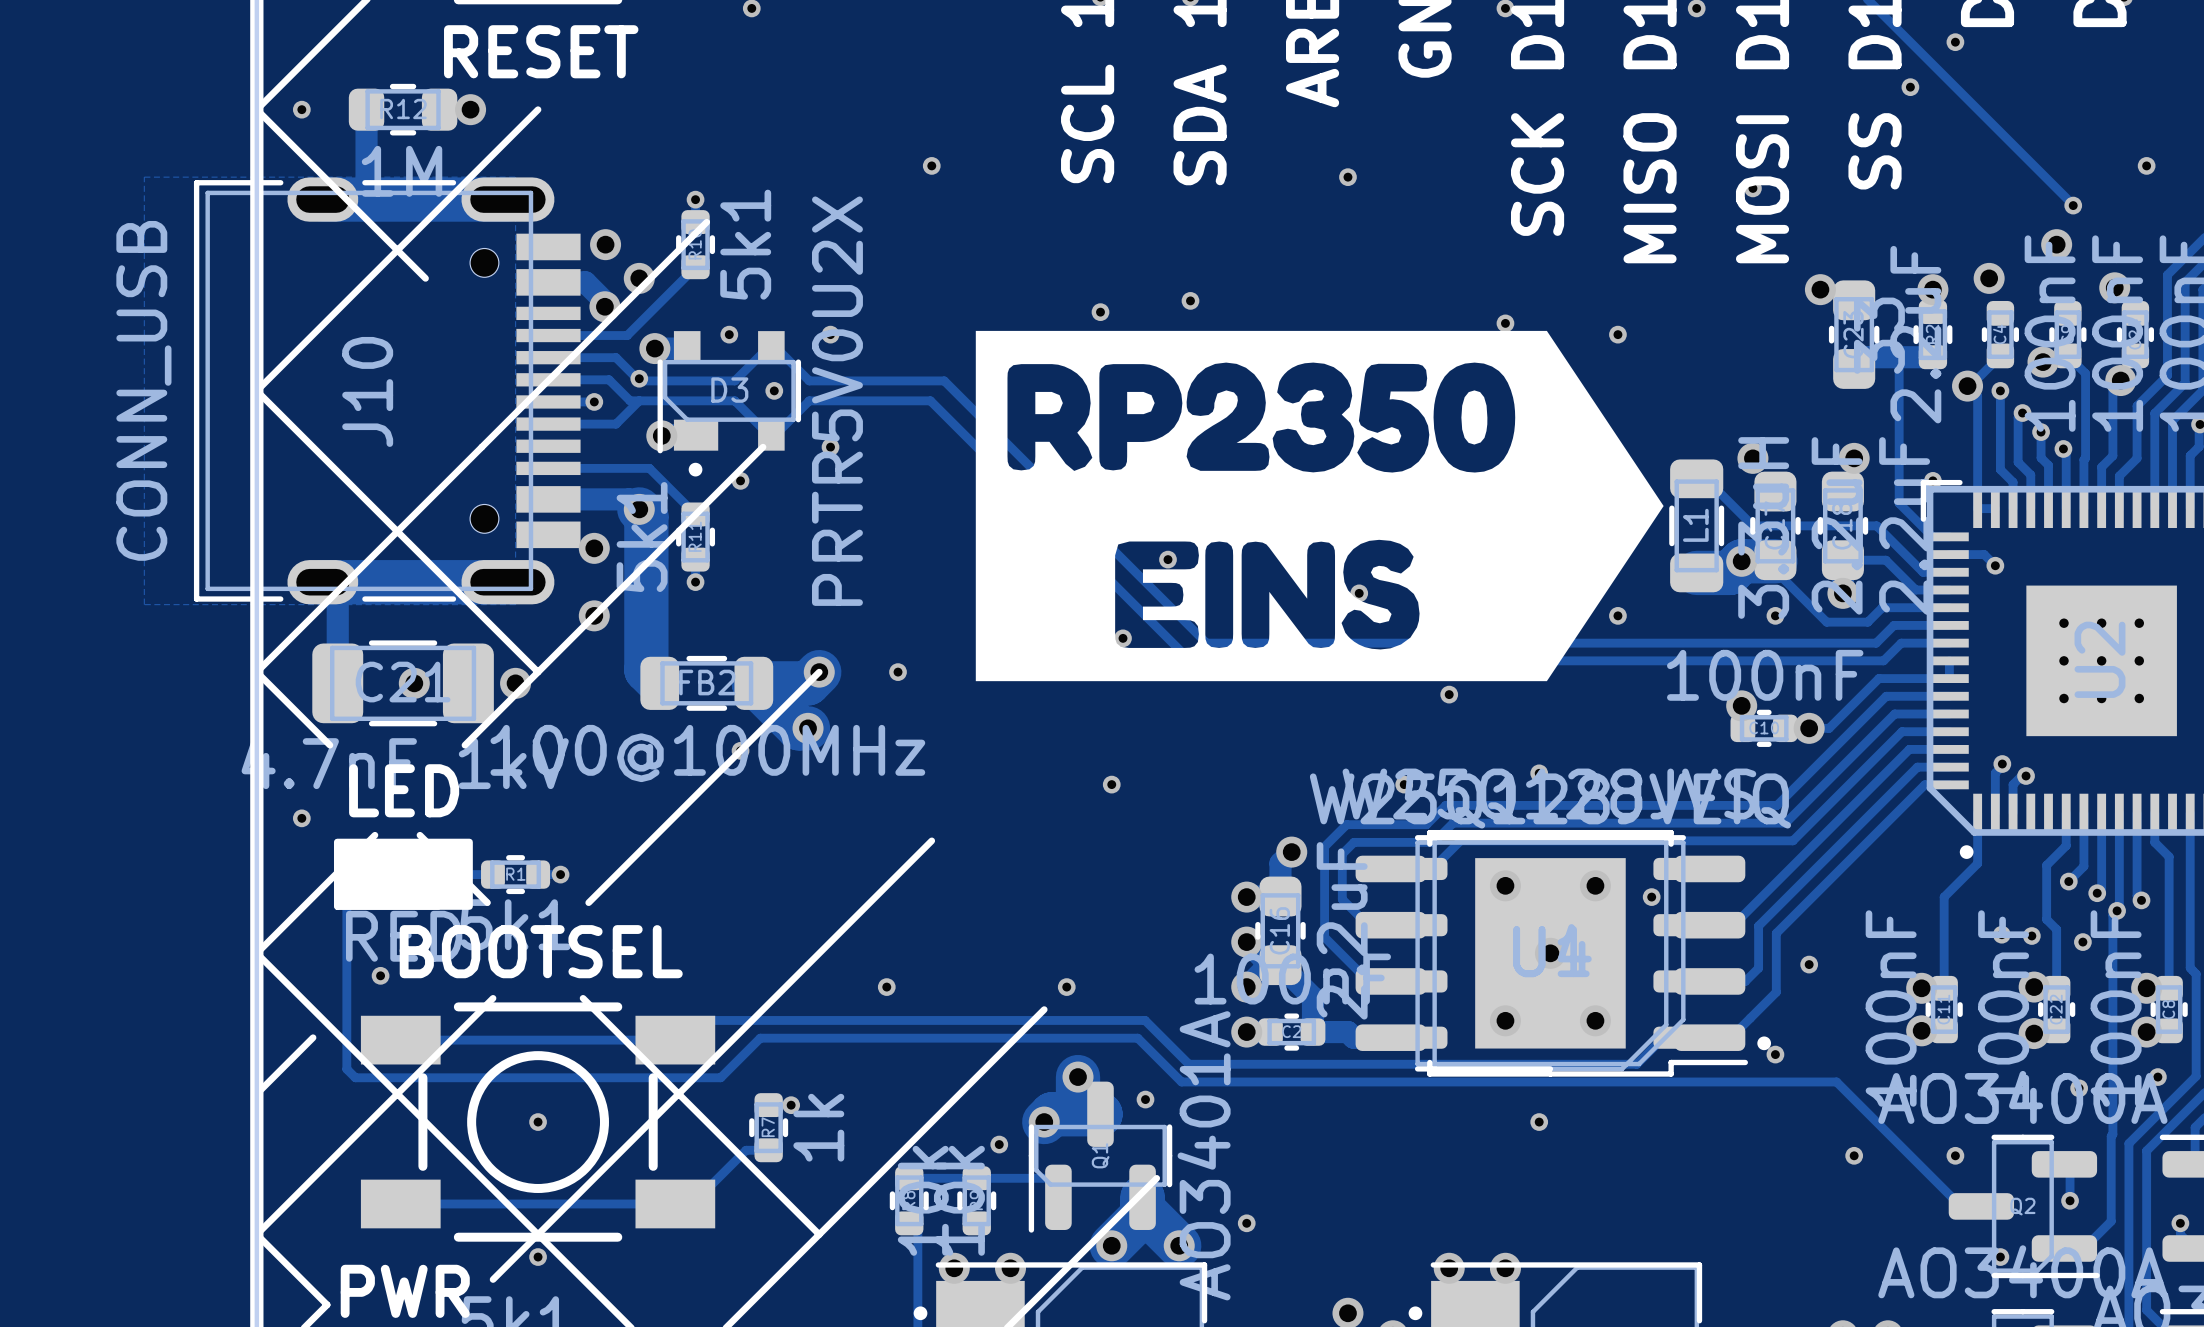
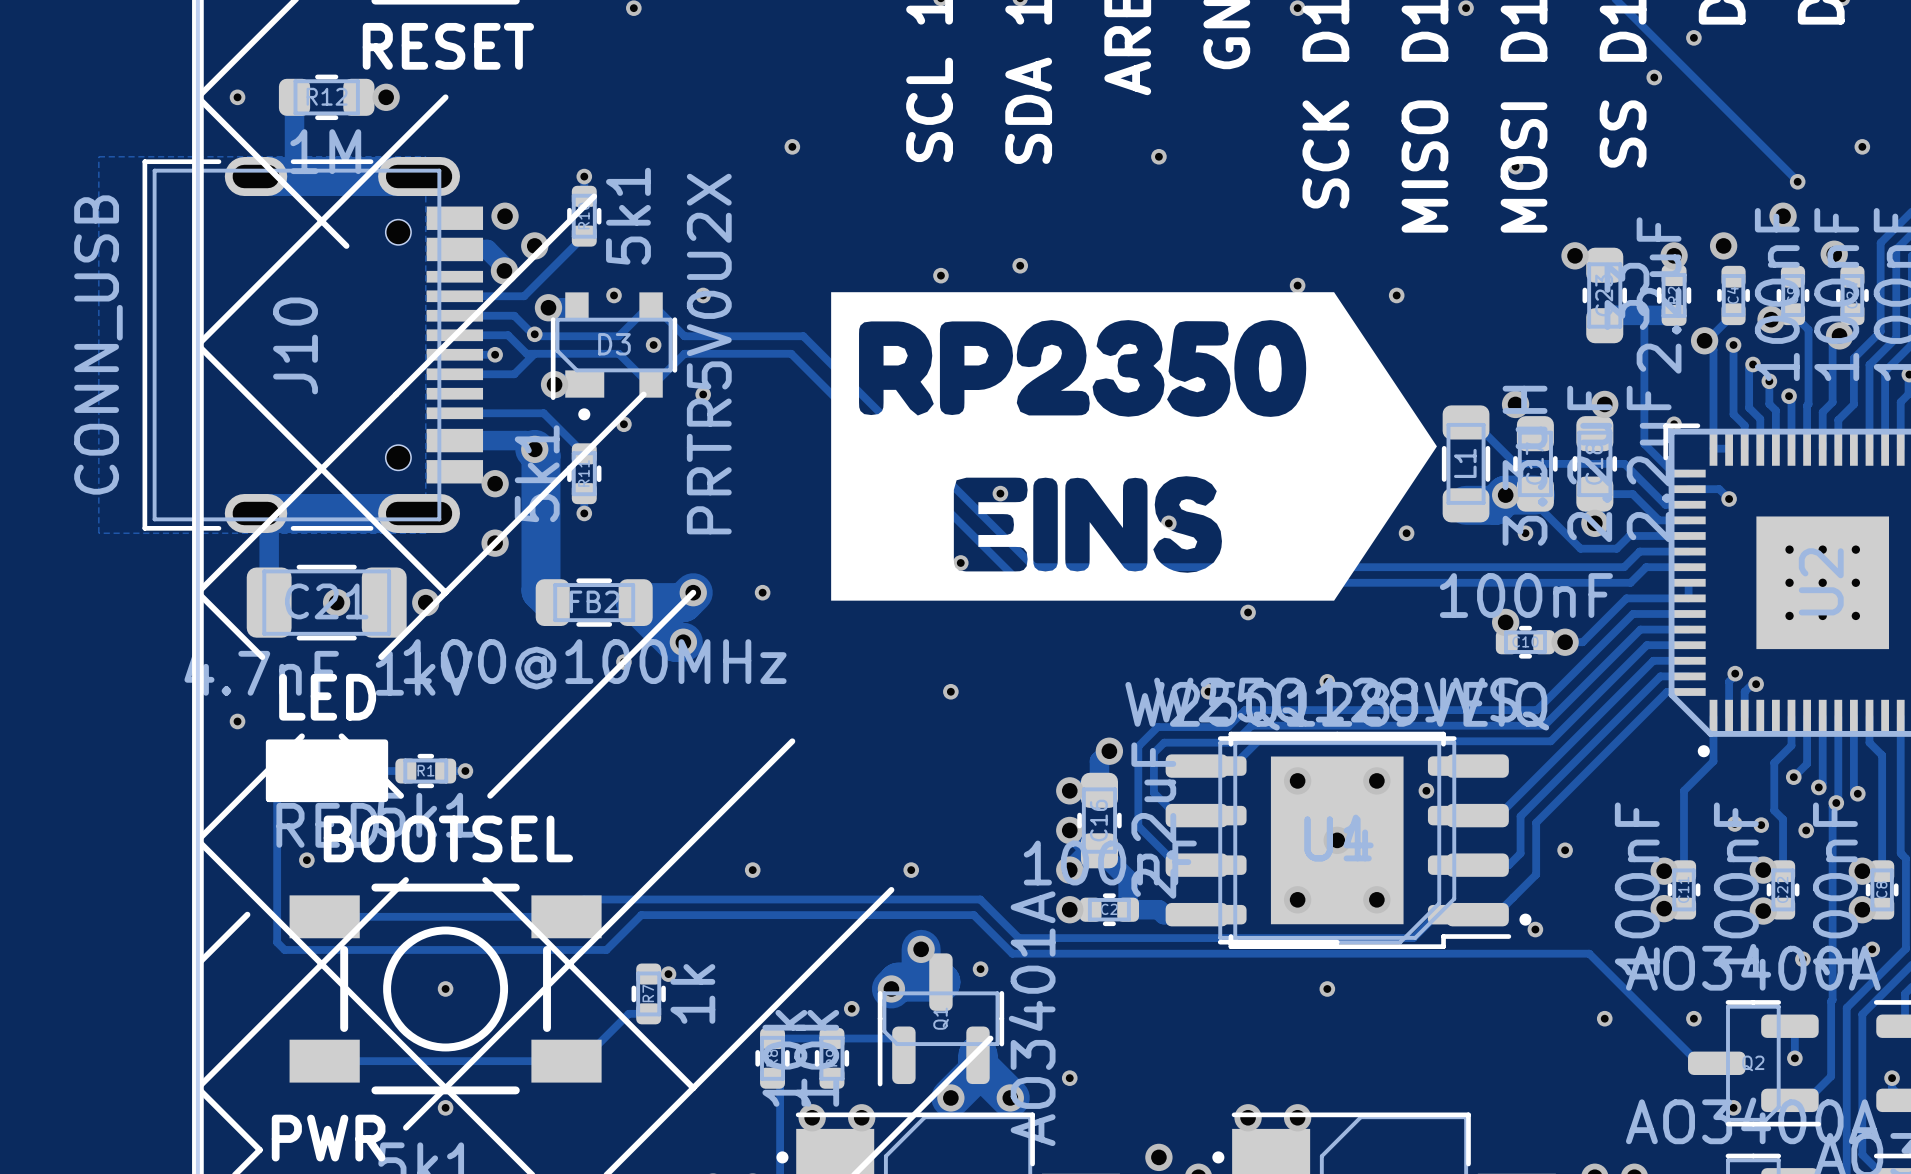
via position: (1617, 615) -> (1406, 533)
via position: (1775, 615) -> (1525, 533)

